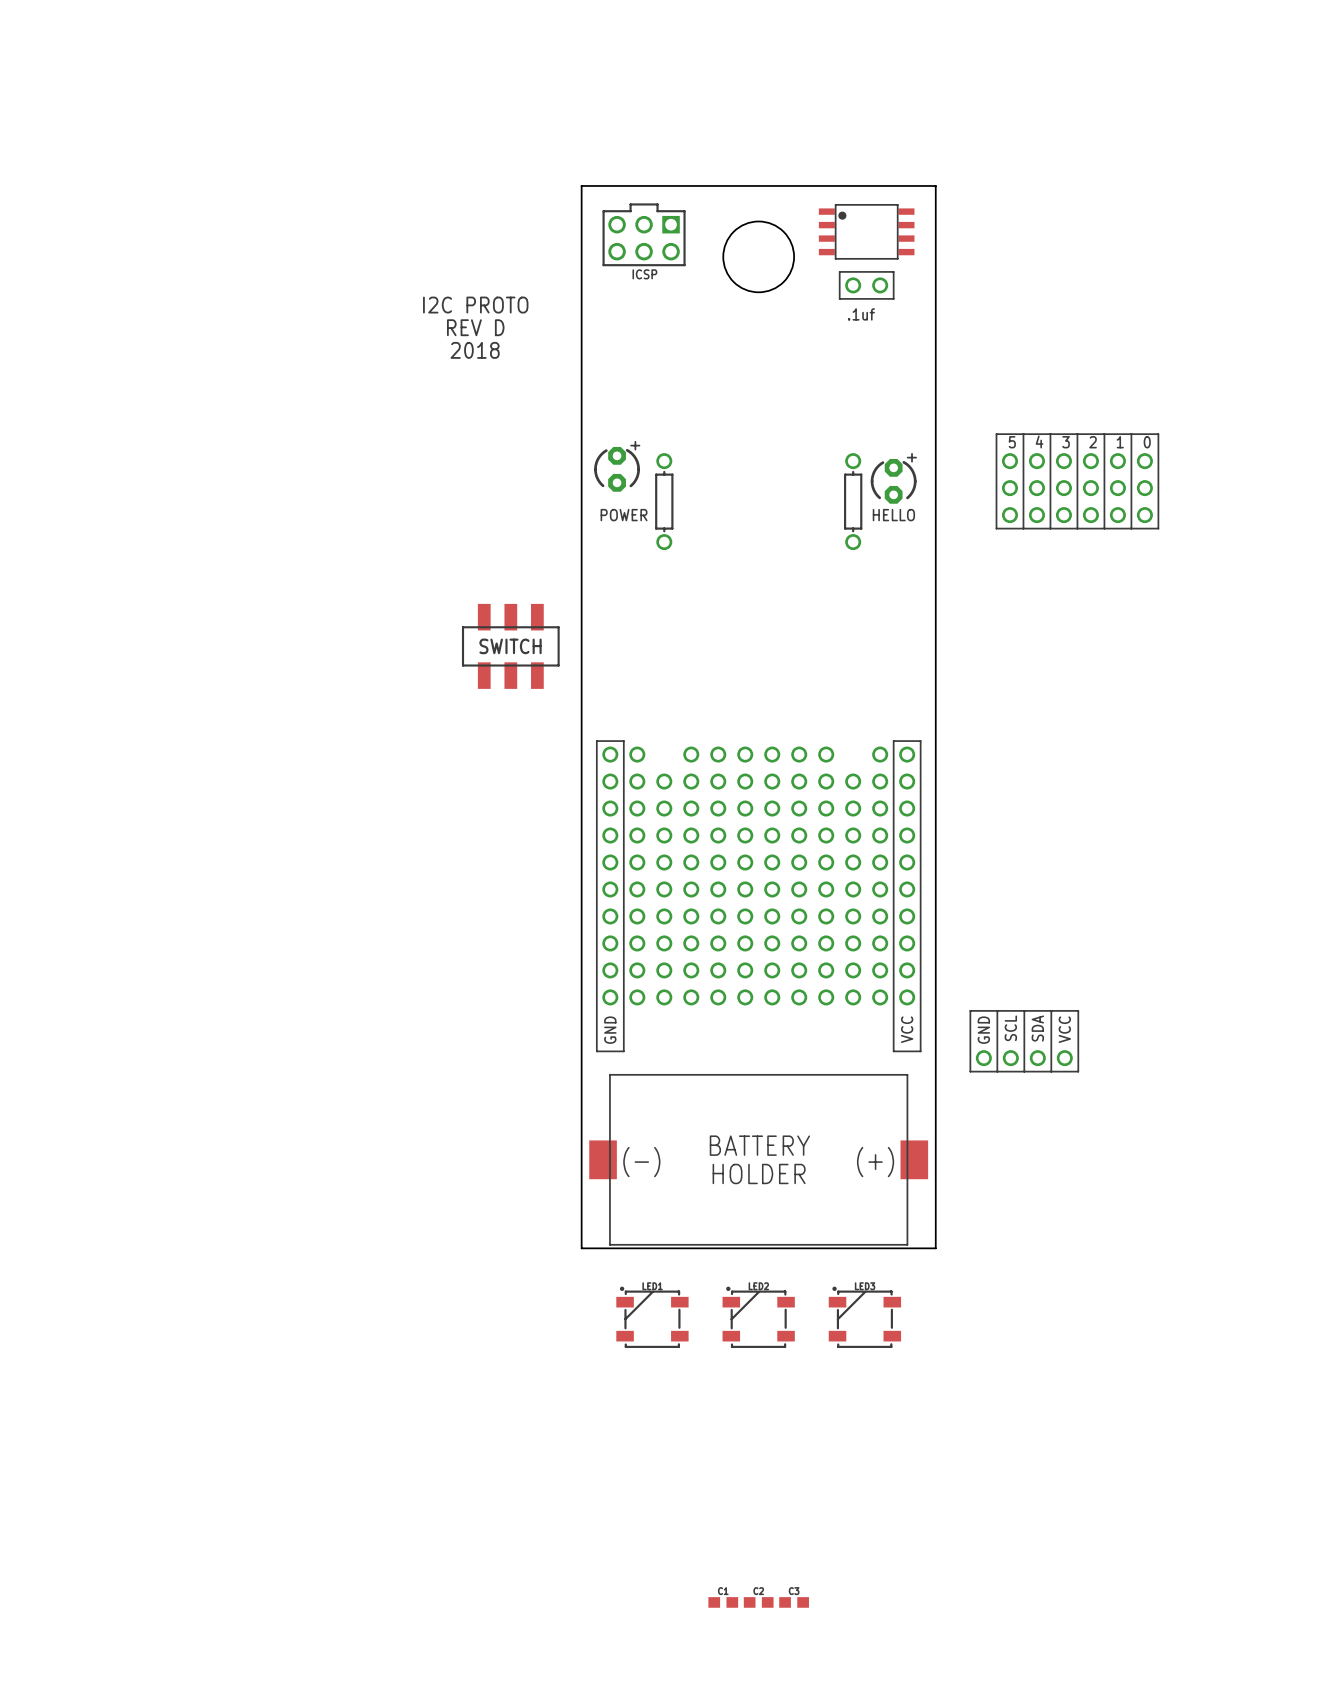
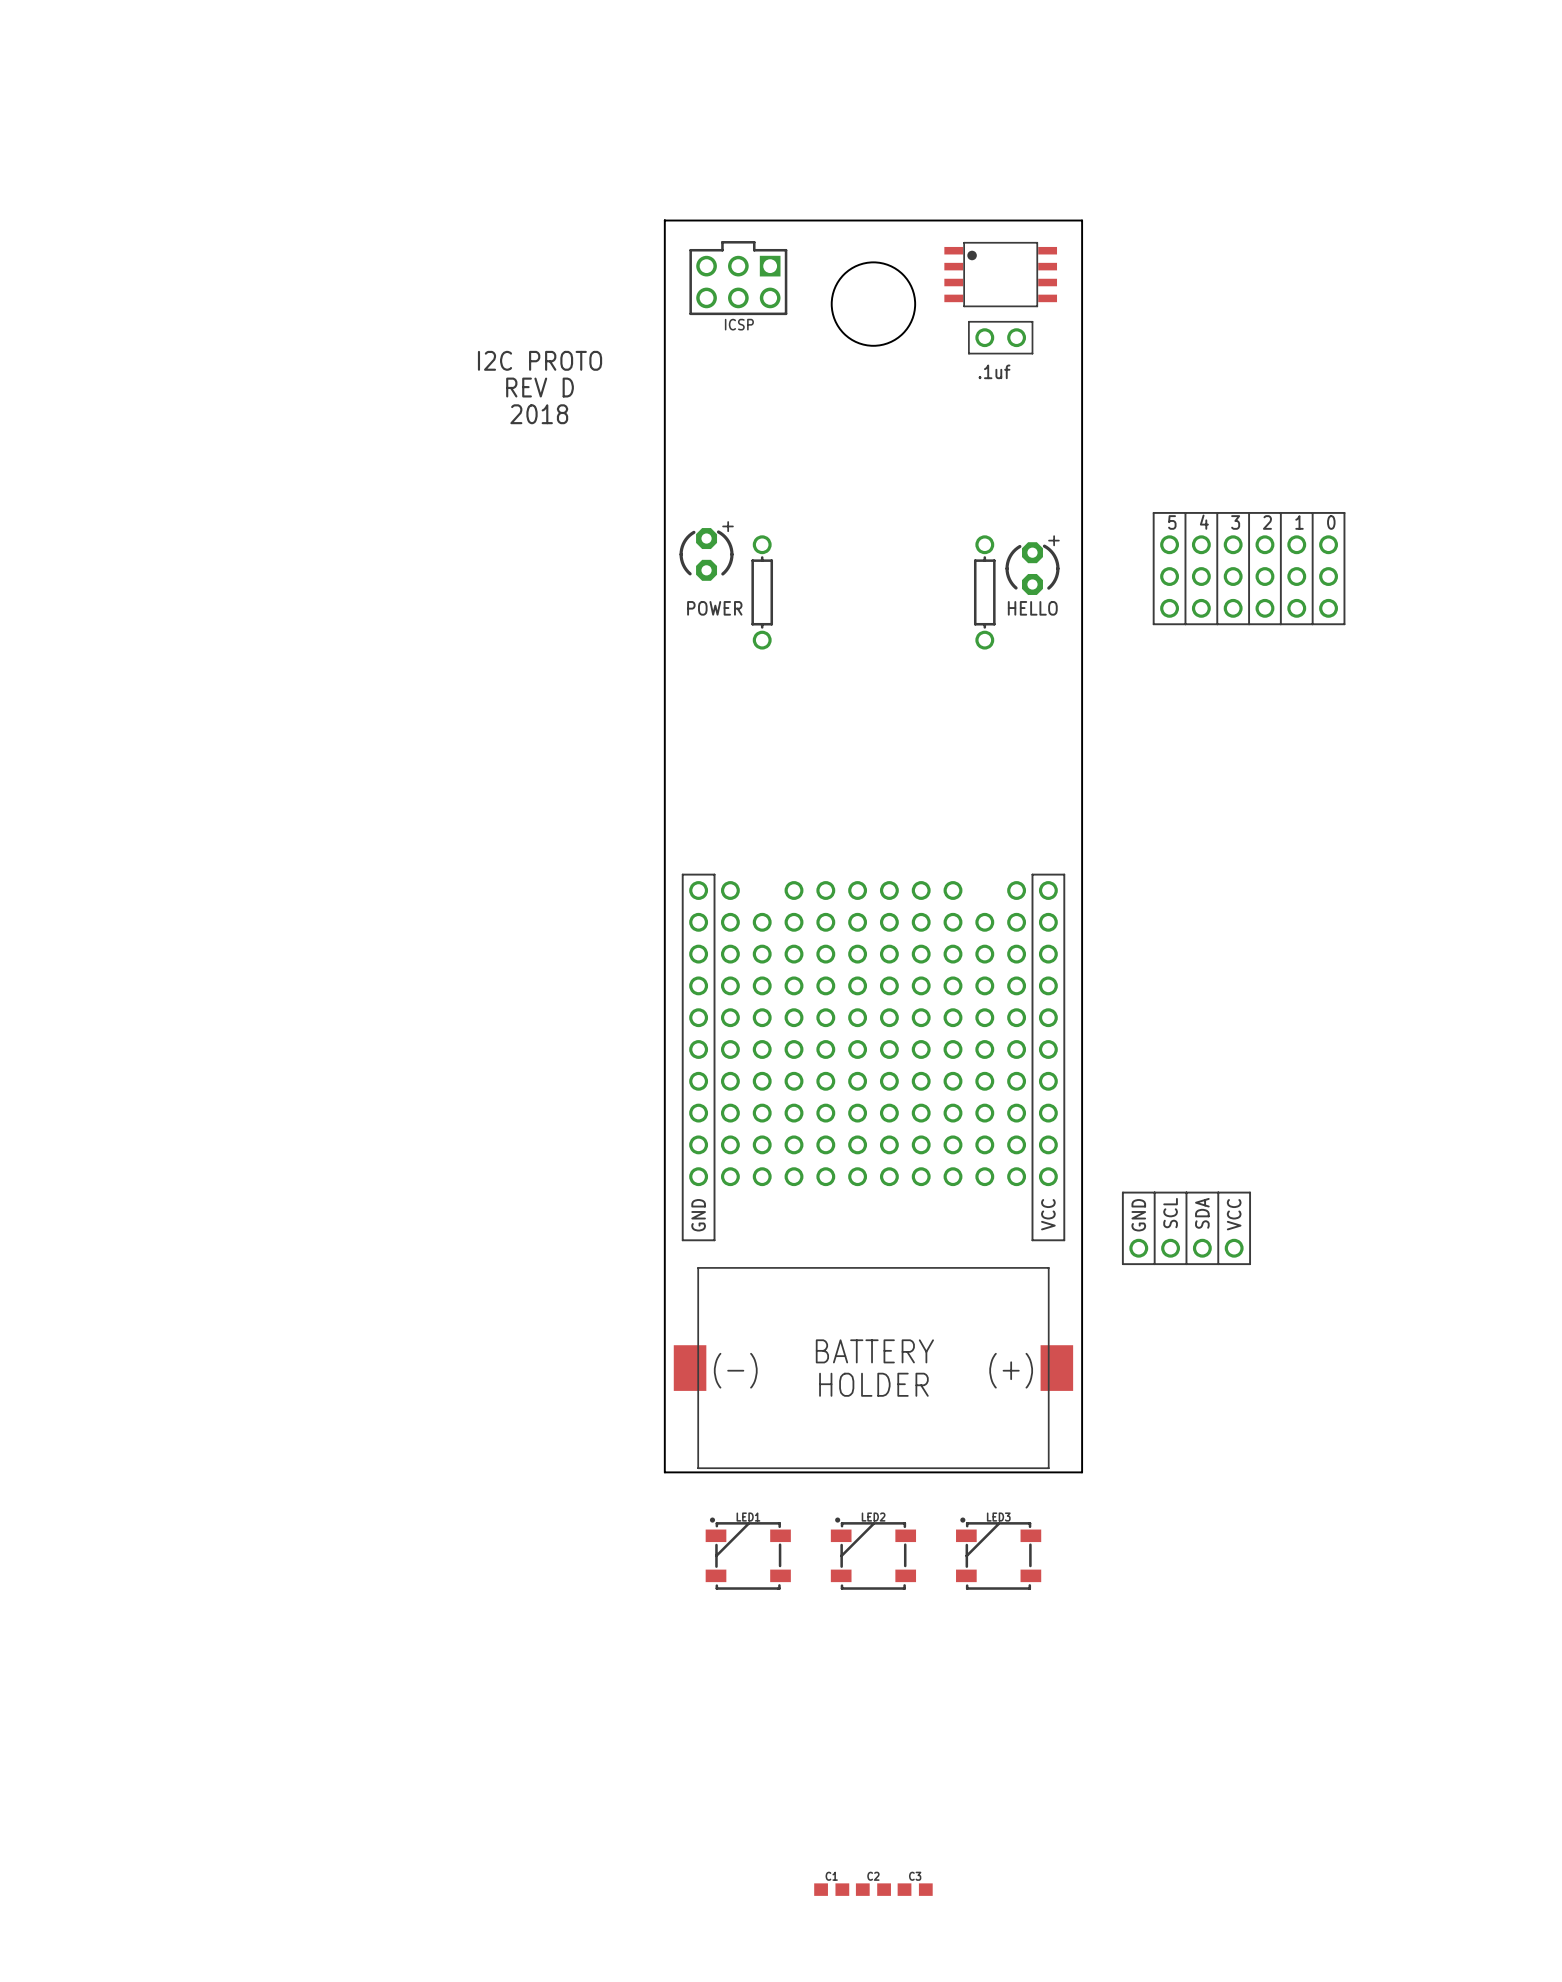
part: (510, 646) -> none

